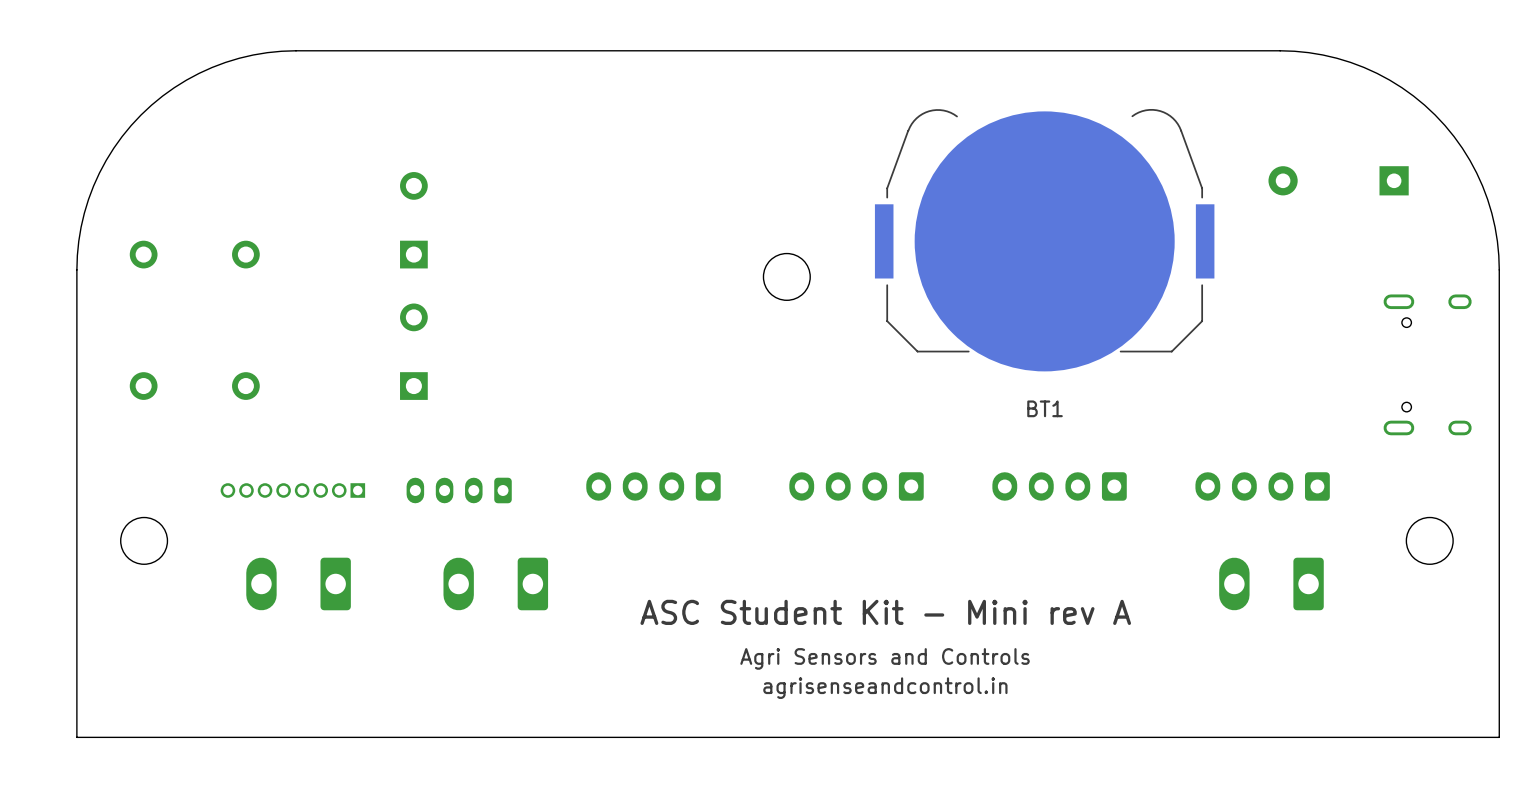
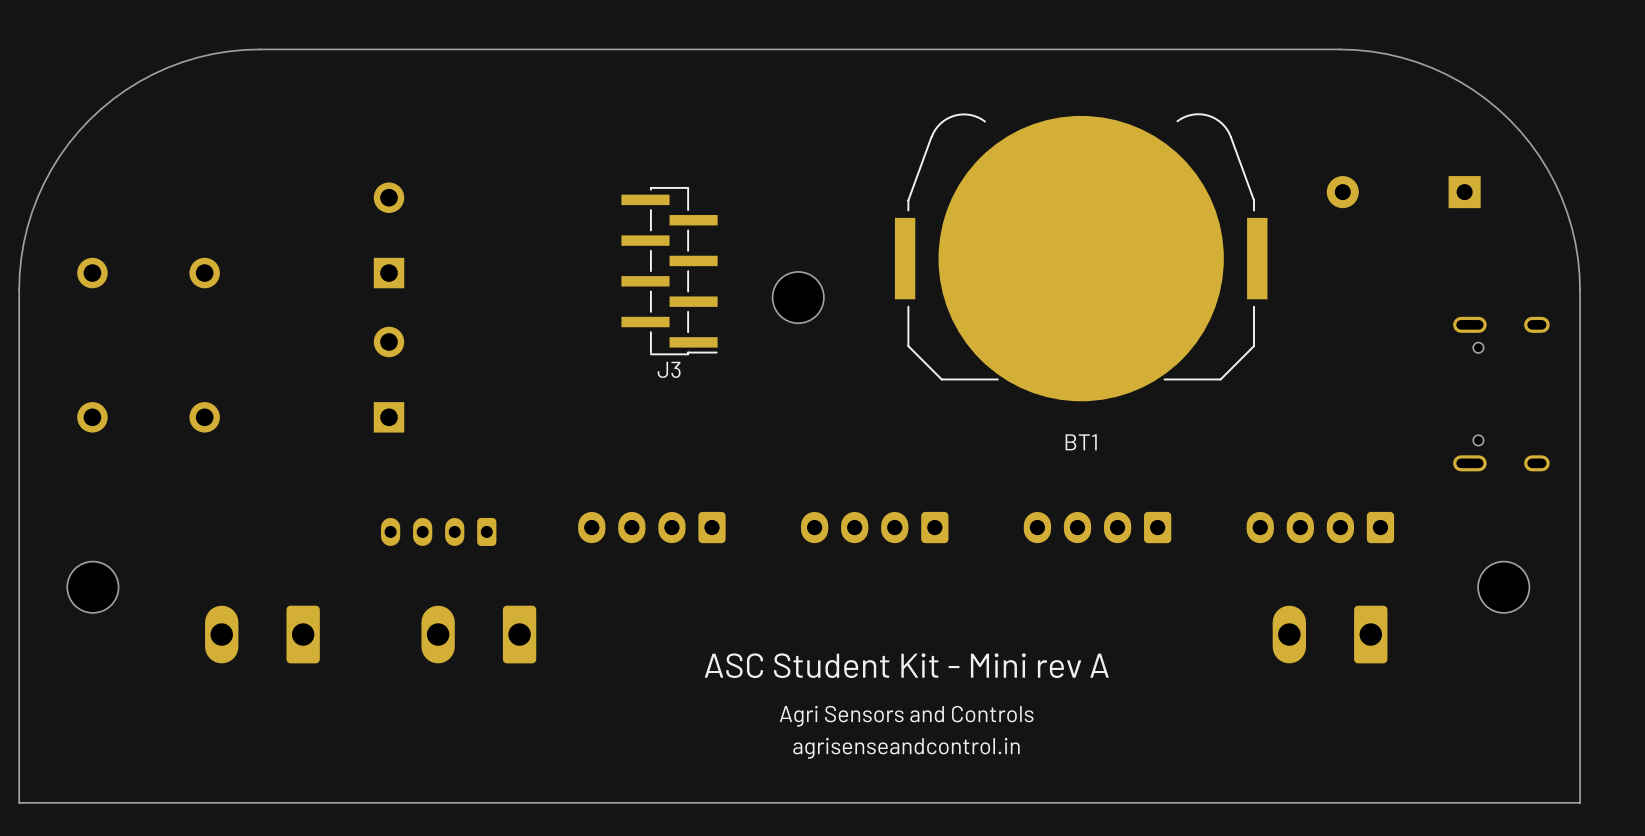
J3: none -> (669, 271)
part: (292, 490) -> none

